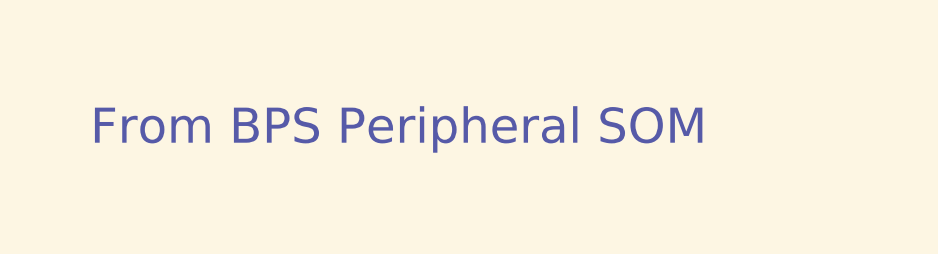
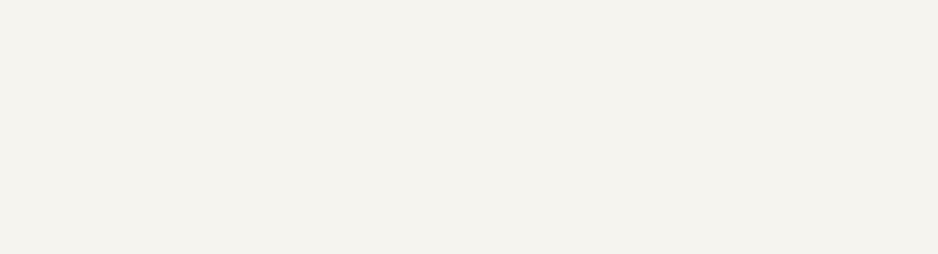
text: From BPS Peripheral SOM (398, 129) -> none

